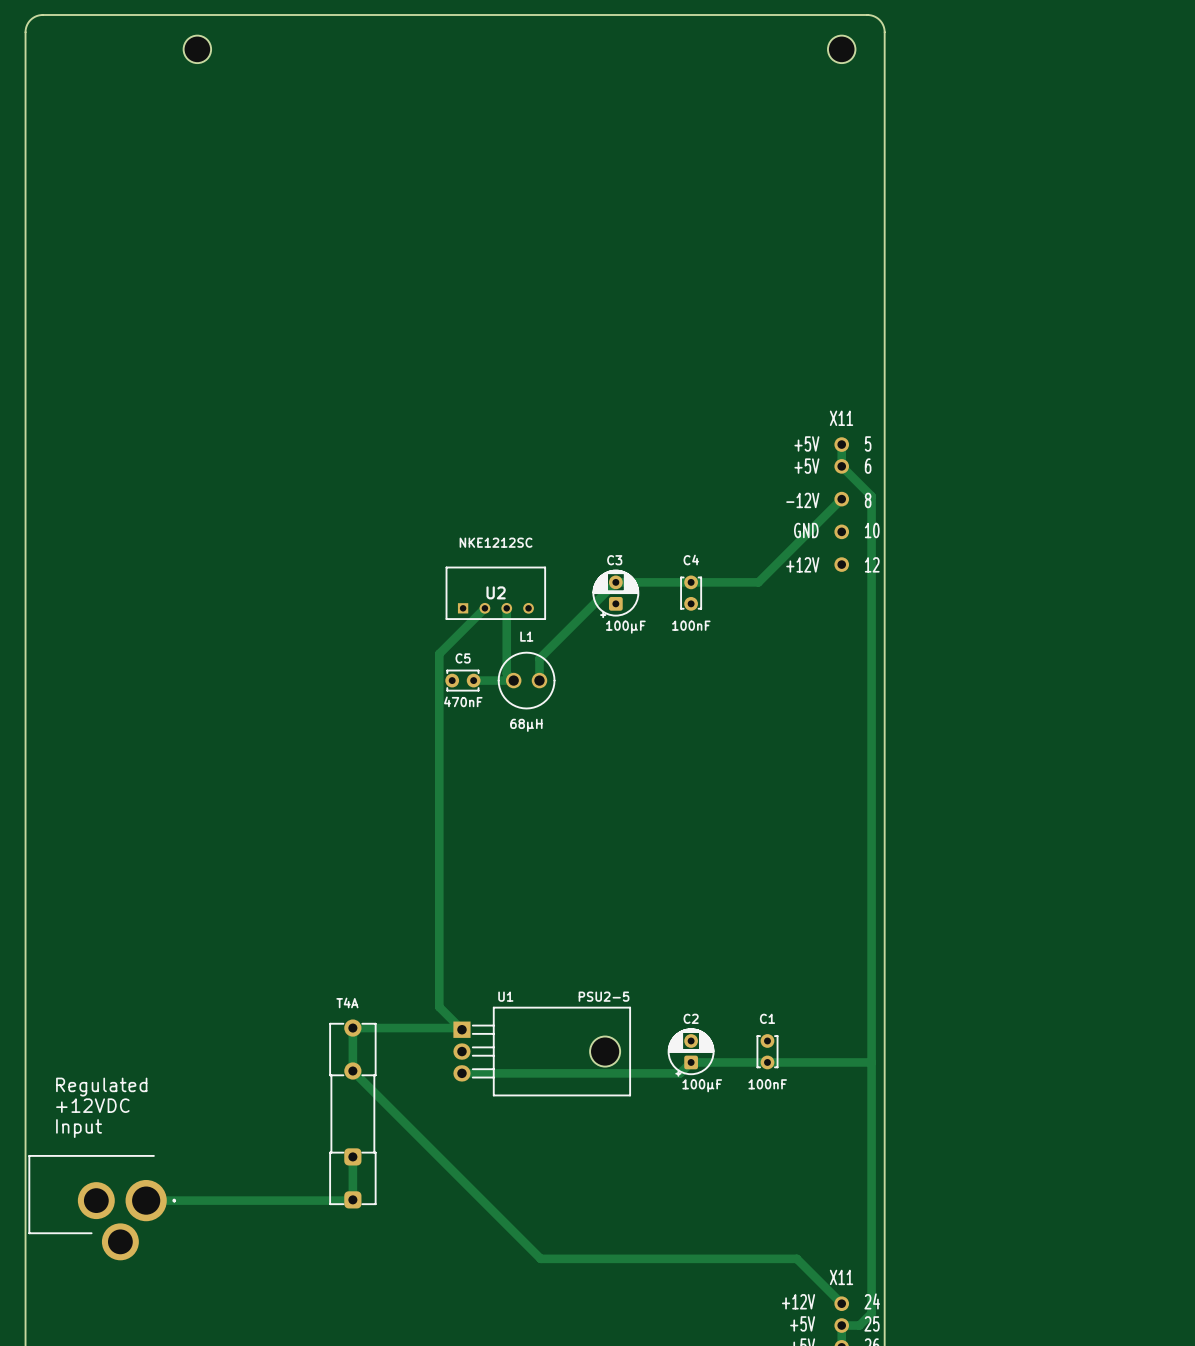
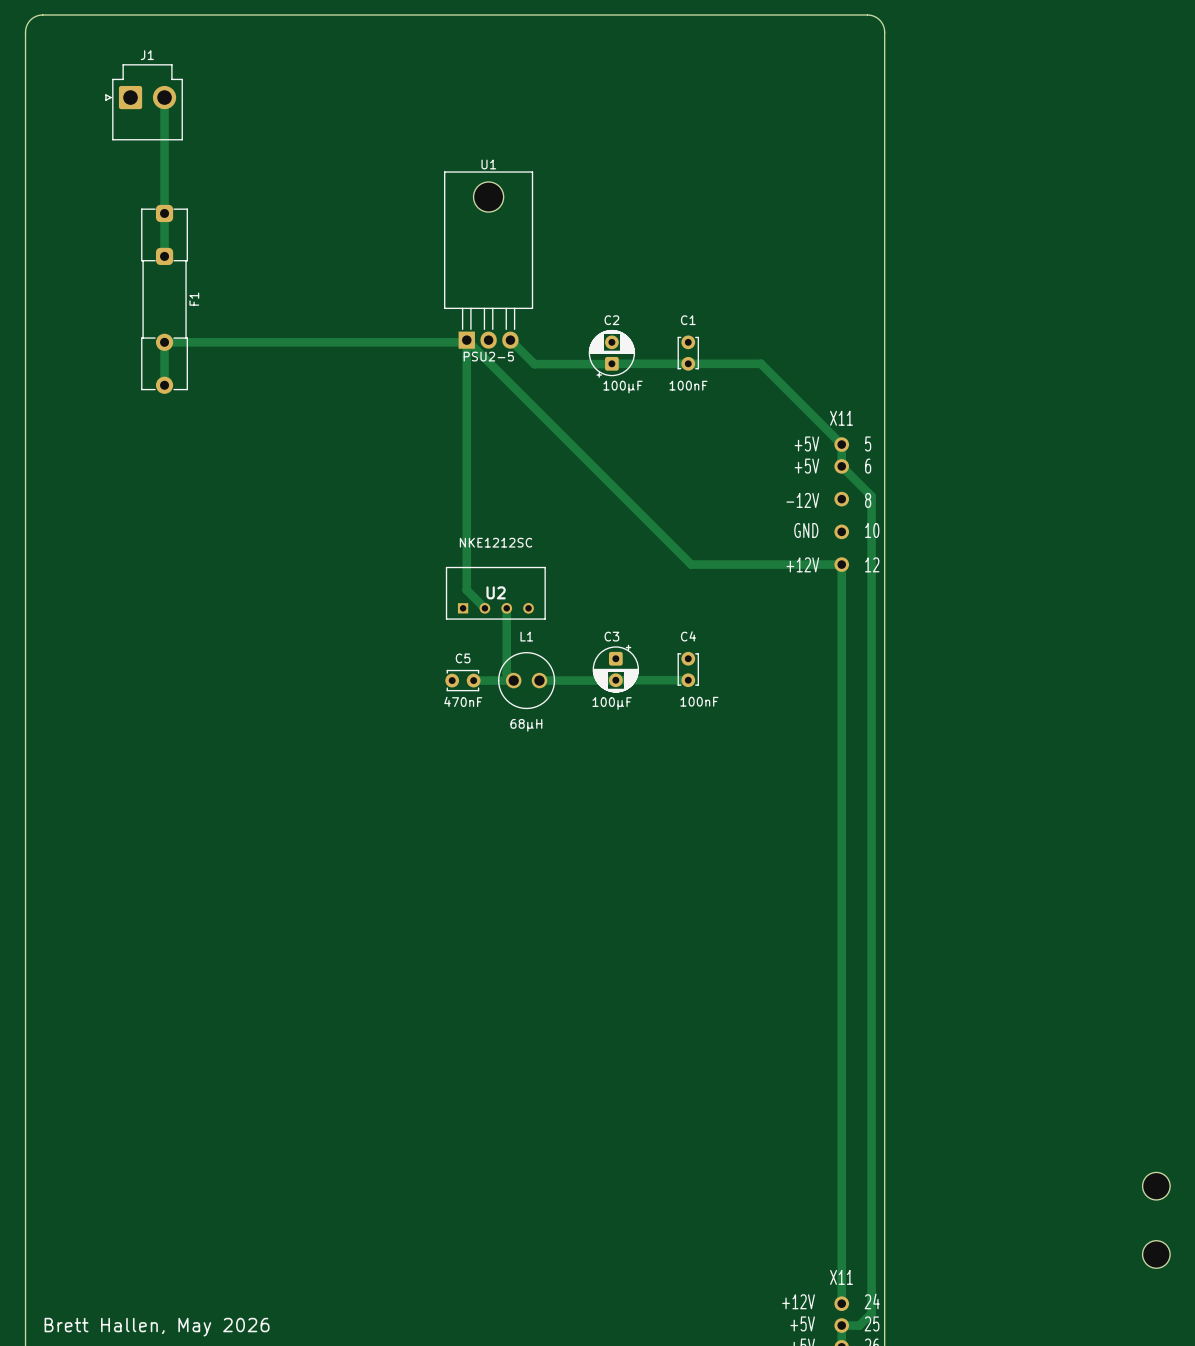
part: (197, 49) -> none
part: (841, 49) -> none
track: none -> (164, 97) (164, 256)
J1: none -> (144, 102)
F1: none -> (164, 299)
track: none -> (466, 340) (464, 342) (164, 342) (164, 385)
track: none -> (510, 340) (534, 364) (760, 363) (841, 444)
track: (841, 499) (758, 582) (615, 582) (539, 658) (539, 680) -> (688, 680) (539, 680)
C3 rotation: 0° (615, 593) -> 180° (615, 668)
C3 position: (615, 593) -> (615, 668)
C4 position: (691, 593) -> (688, 669)
track: (484, 608) (439, 653) (439, 1007) (461, 1029) -> (484, 608) (466, 590) (466, 340)
C4 value position: 100nF (691, 625) -> 100nF (699, 701)
U1 name position: U1 (505, 996) -> U1 (488, 164)
U1 value position: PSU2-5 (604, 996) -> PSU2-5 (488, 356)
track: (460, 1028) (352, 1028) (352, 1071) (540, 1258) (796, 1258) (841, 1303) -> (466, 340) (691, 564) (841, 564) (841, 1303)
U1 rotation: 0° (542, 1051) -> 90° counterclockwise (488, 260)
U1 position: (542, 1051) -> (488, 260)
C1 position: (767, 1051) -> (688, 353)
C2 position: (691, 1052) -> (611, 353)
track: (871, 1062) (691, 1062) (680, 1073) (461, 1073) -> none
text: Regulated (101, 1087) -> none
text: +12VDC (92, 1105) -> none
part: T4A (352, 1113) -> none
text: Input (79, 1128) -> none
track: (352, 1156) (352, 1200) (146, 1200) -> none
part: none -> (1156, 1186)
part: (102, 1207) -> none
part: none -> (1156, 1254)
text: none -> Brett Hallen, May 2026 (157, 1327)

